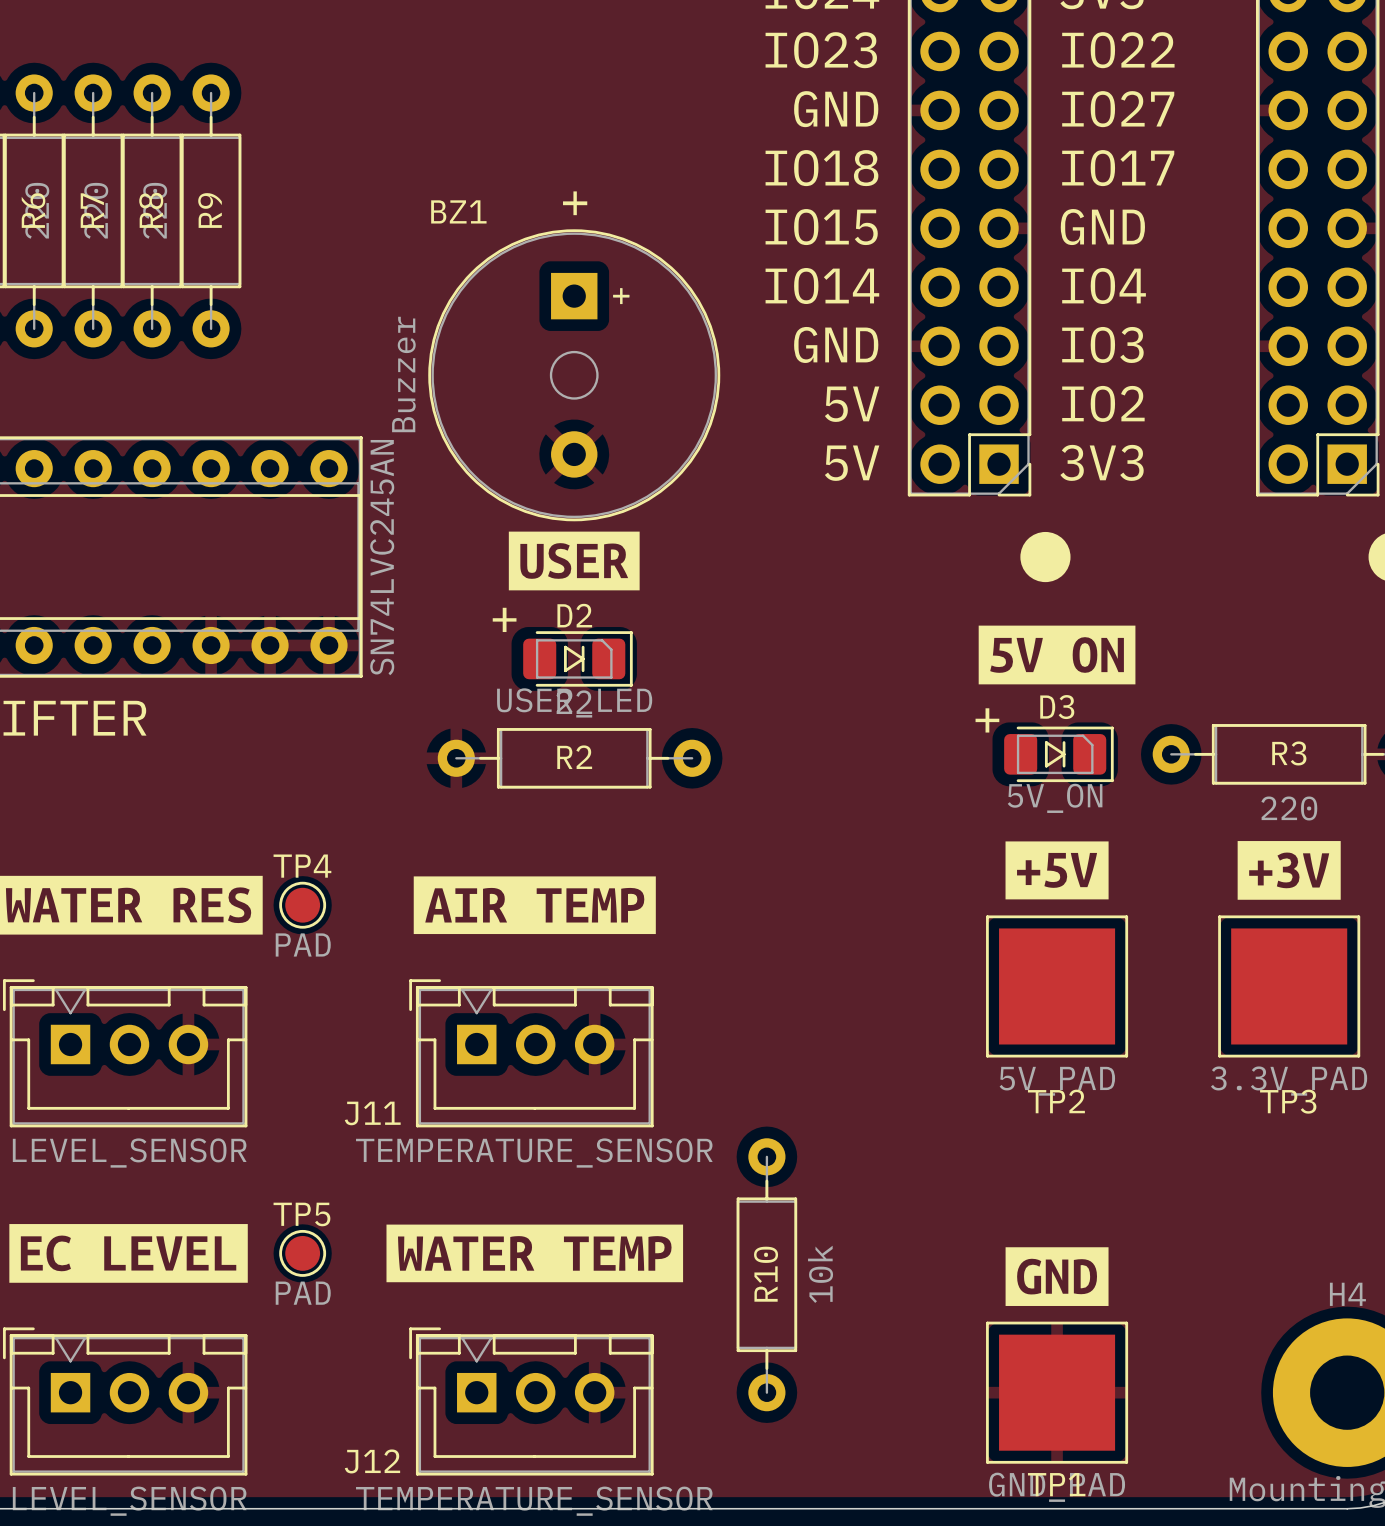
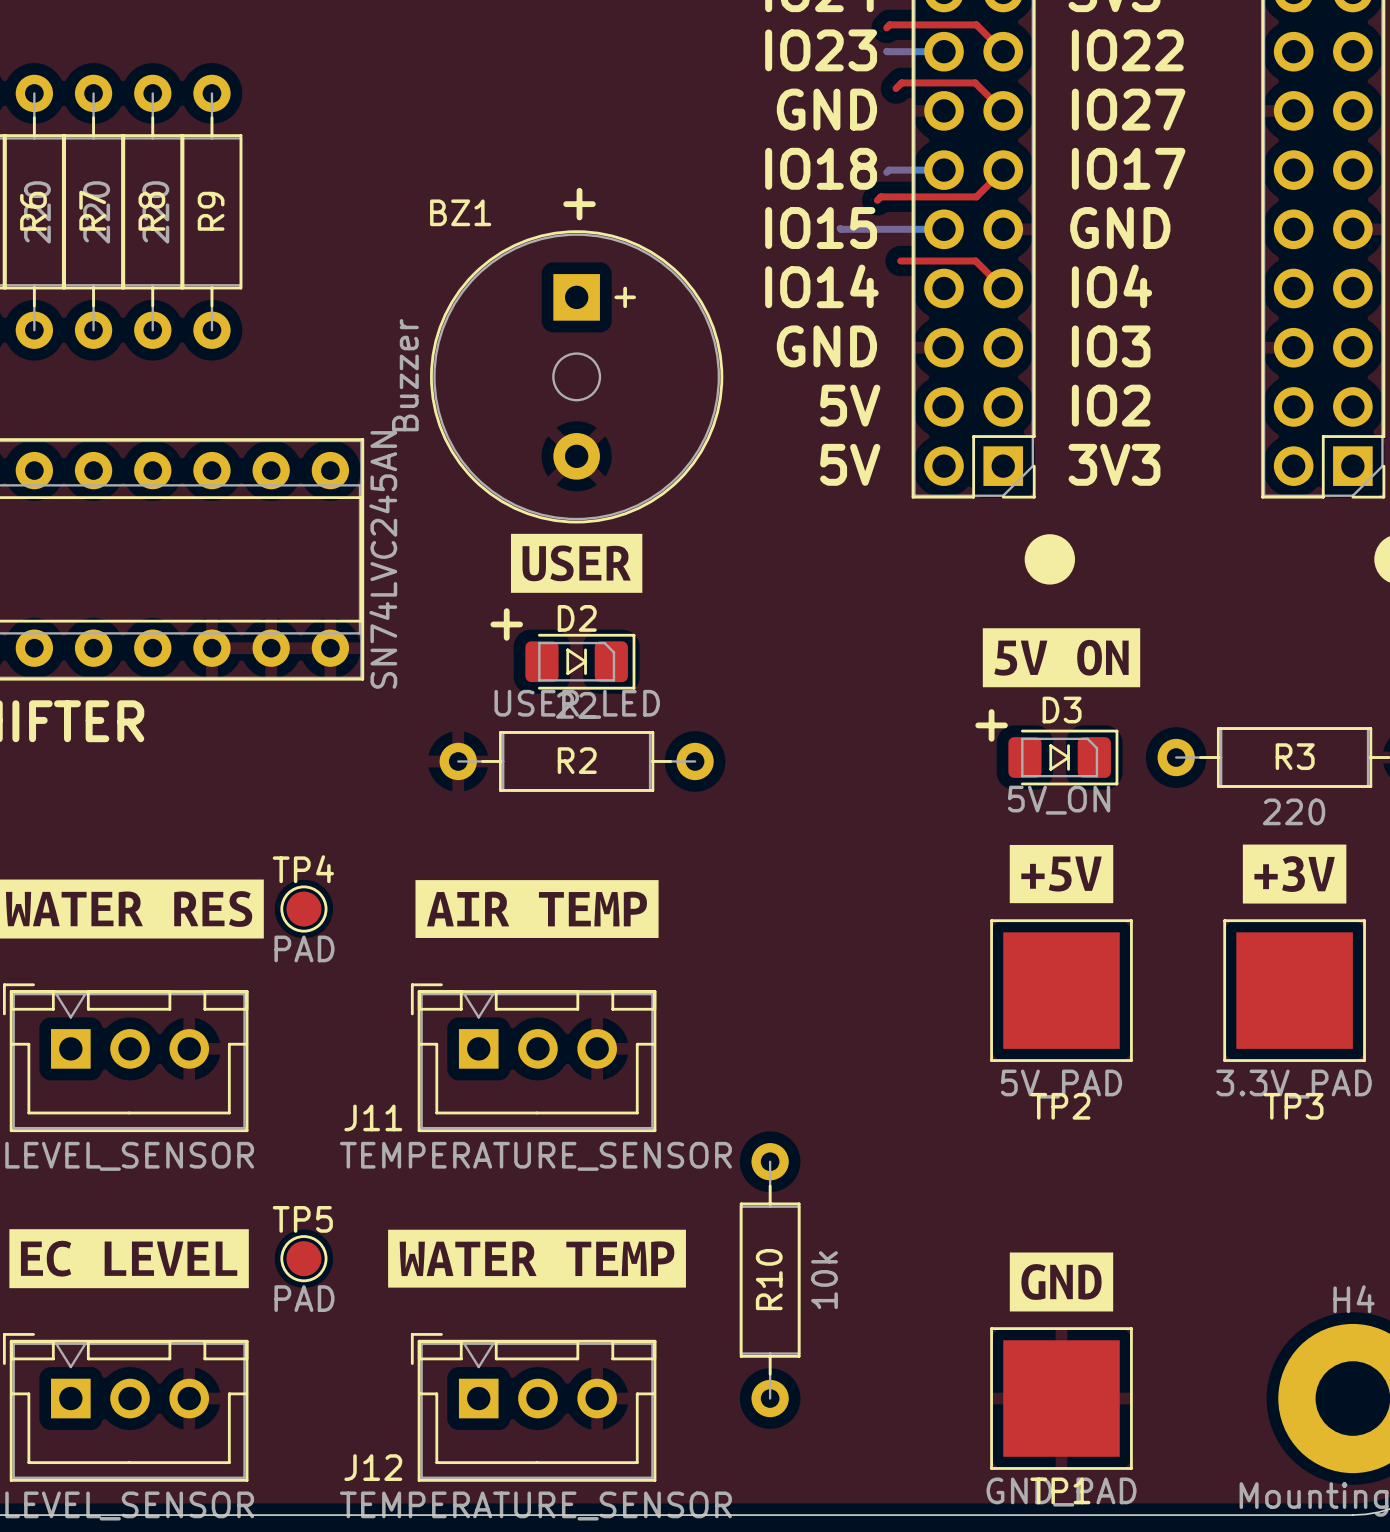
top track: none -> (886, 27) (889, 24) (976, 24) (1003, 51)
bottom track: none -> (886, 51) (944, 51)
top track: none -> (896, 88) (901, 82) (975, 82) (1003, 110)
bottom track: none -> (944, 170) (889, 170) (886, 172)
top track: none -> (1003, 170) (976, 196) (880, 196) (877, 200)
bottom track: none -> (840, 228) (944, 229)
top track: none -> (900, 261) (975, 261) (1003, 288)

